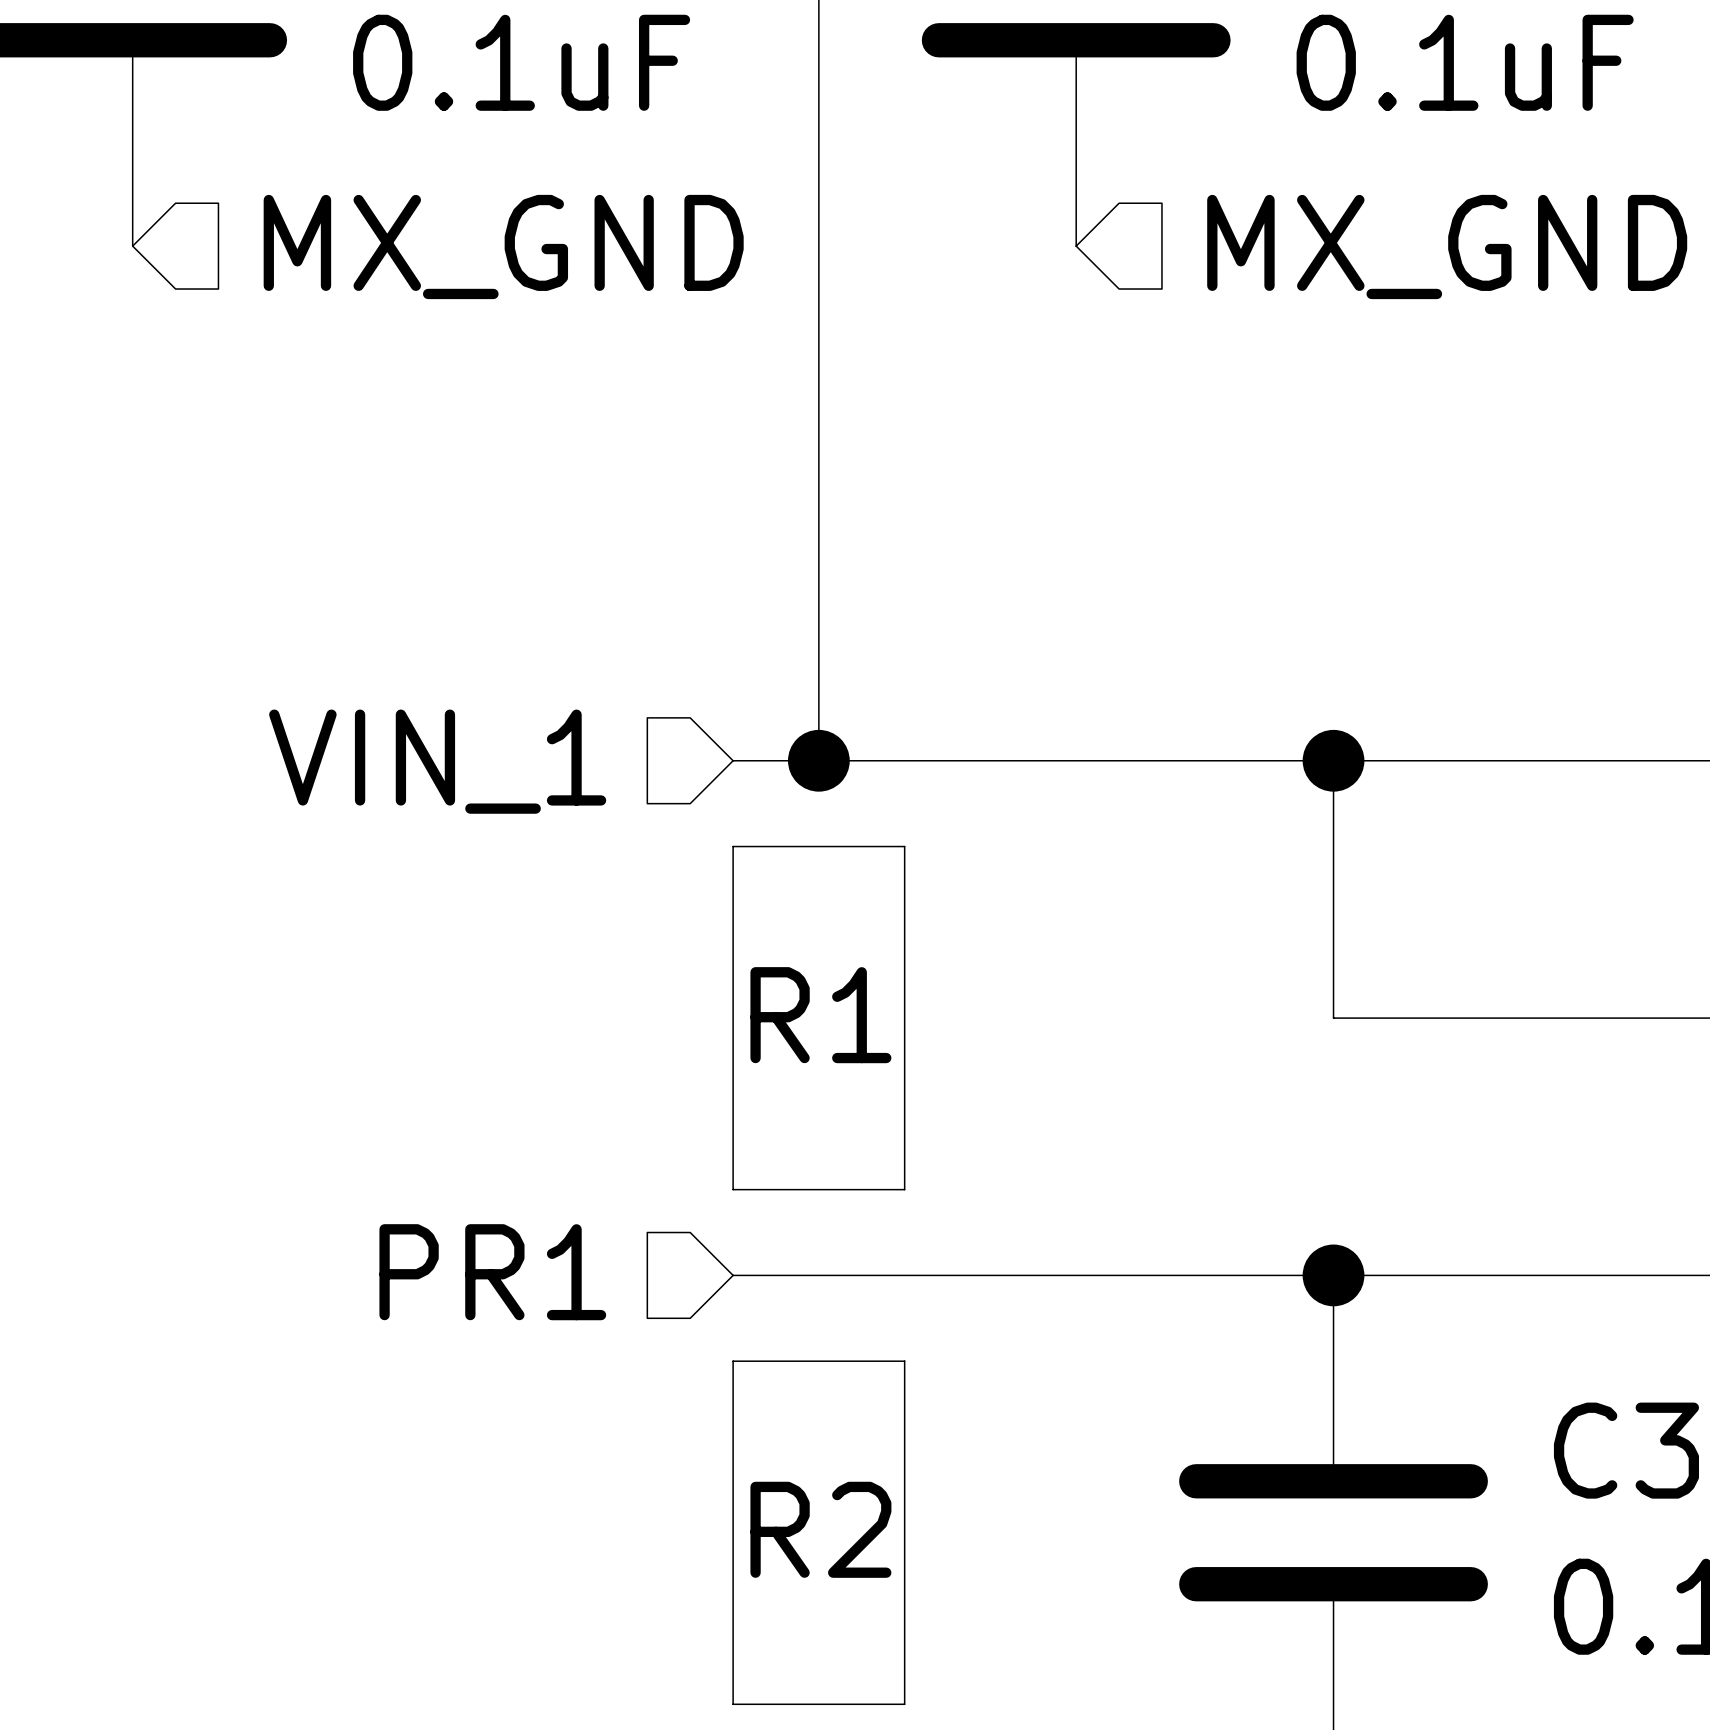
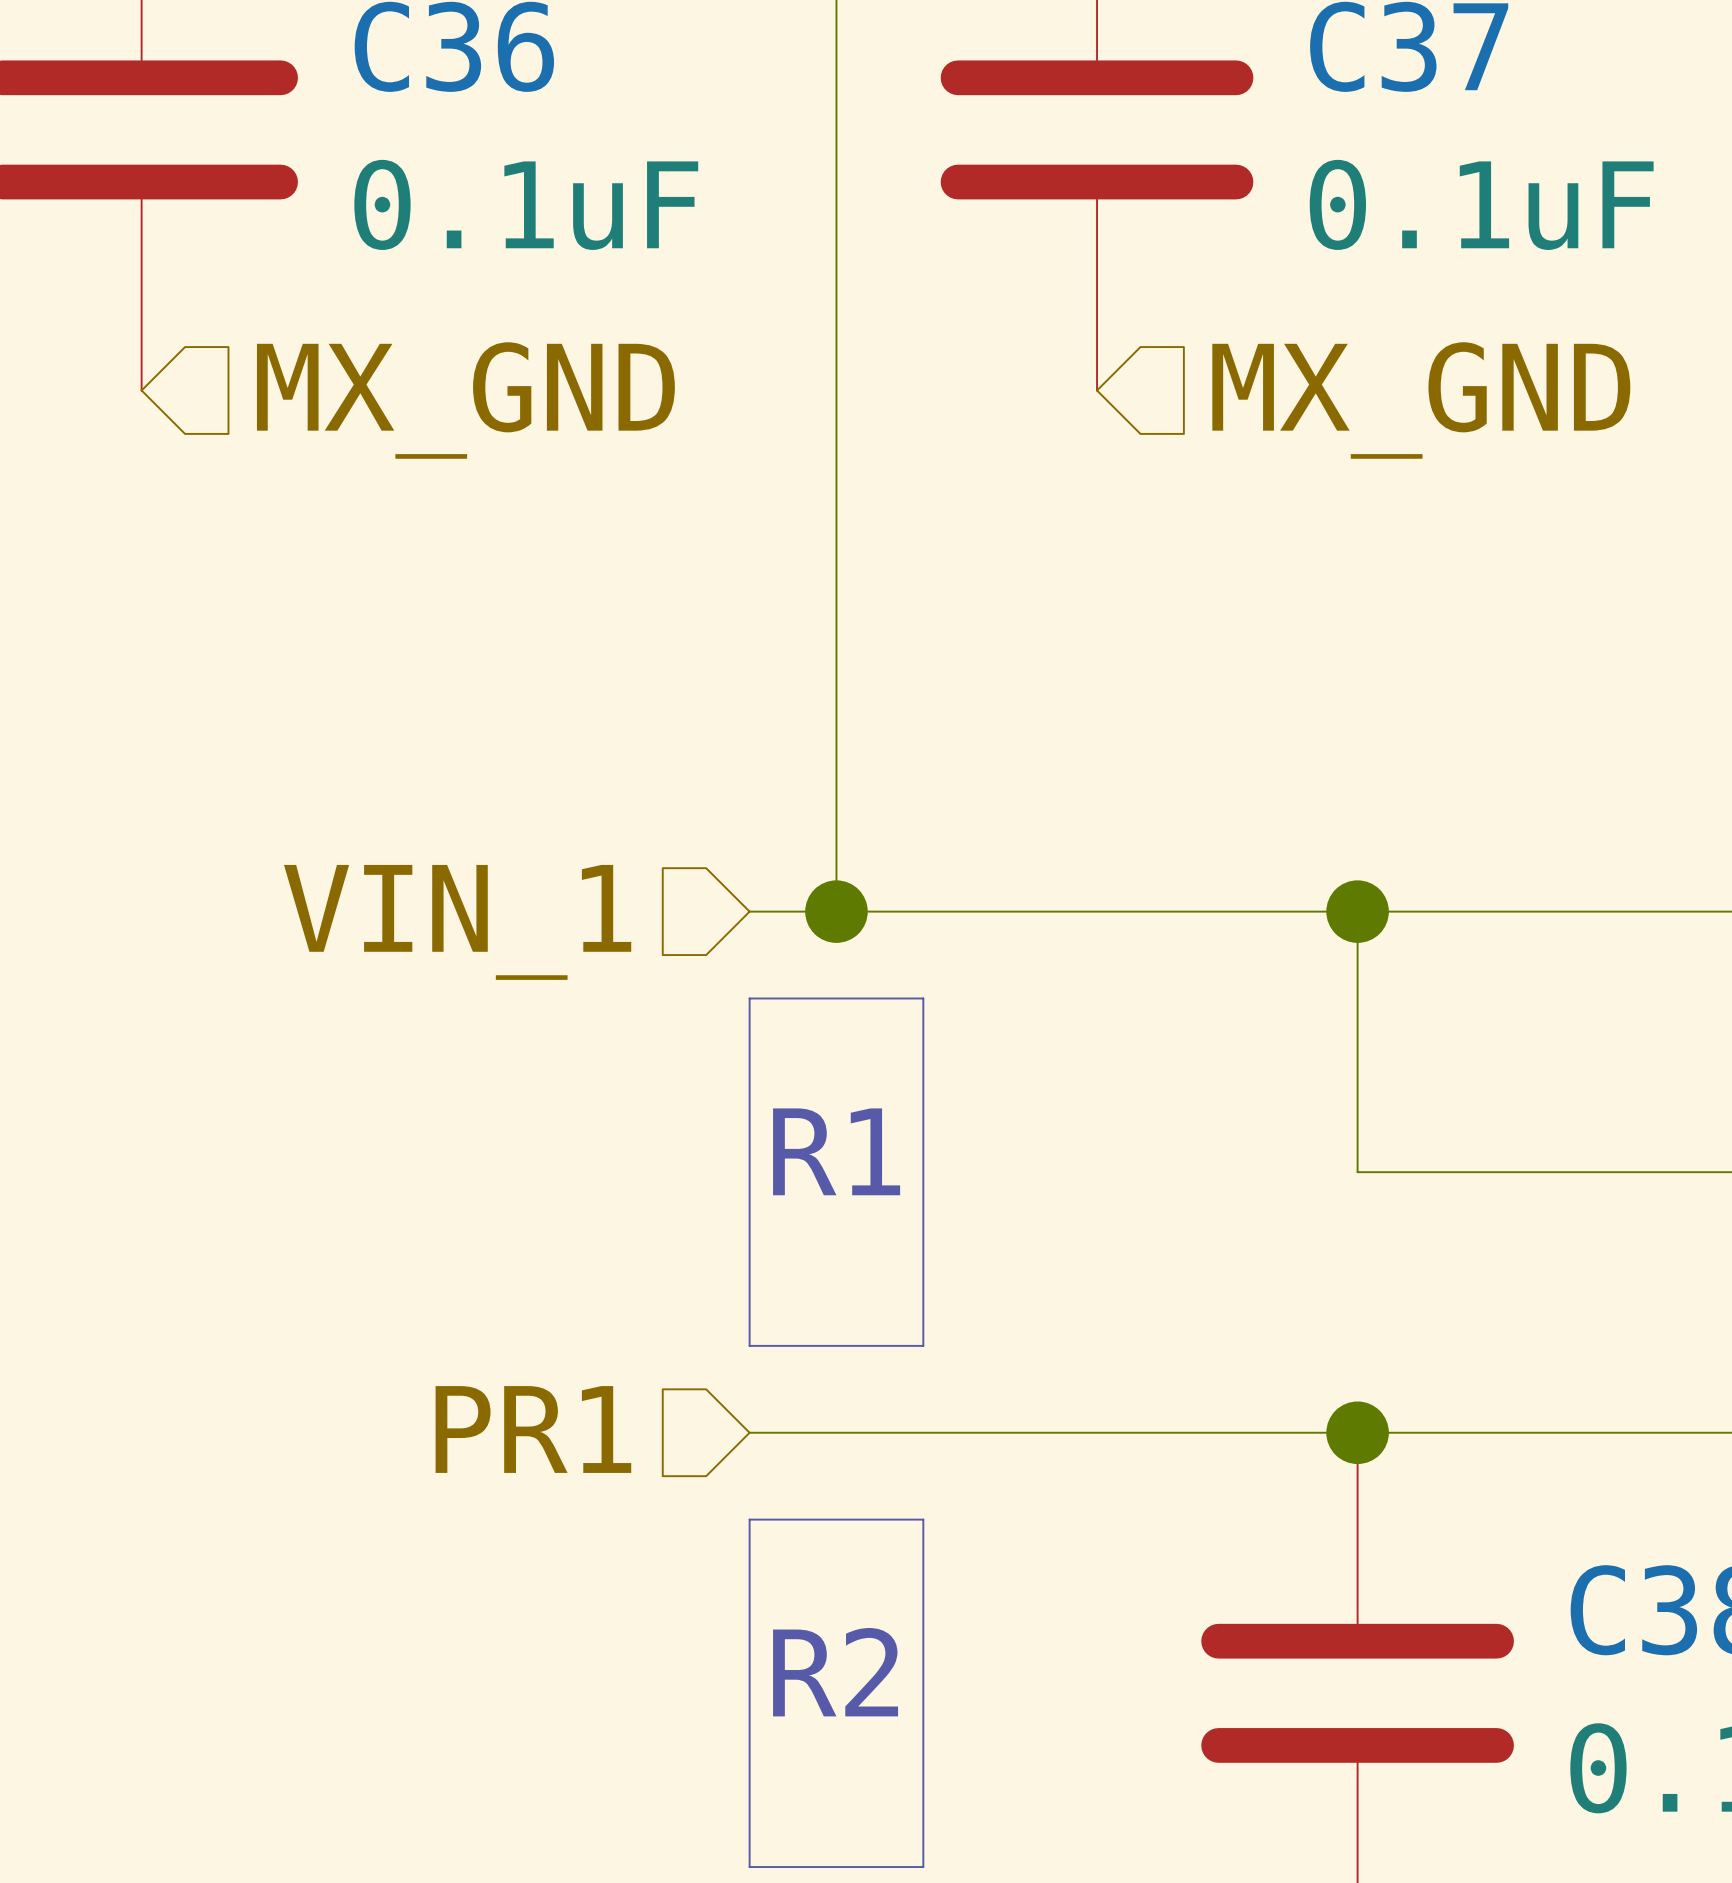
text position: R1 (820, 1015) -> R1 (836, 1151)
text position: R2 (820, 1529) -> R2 (835, 1672)

